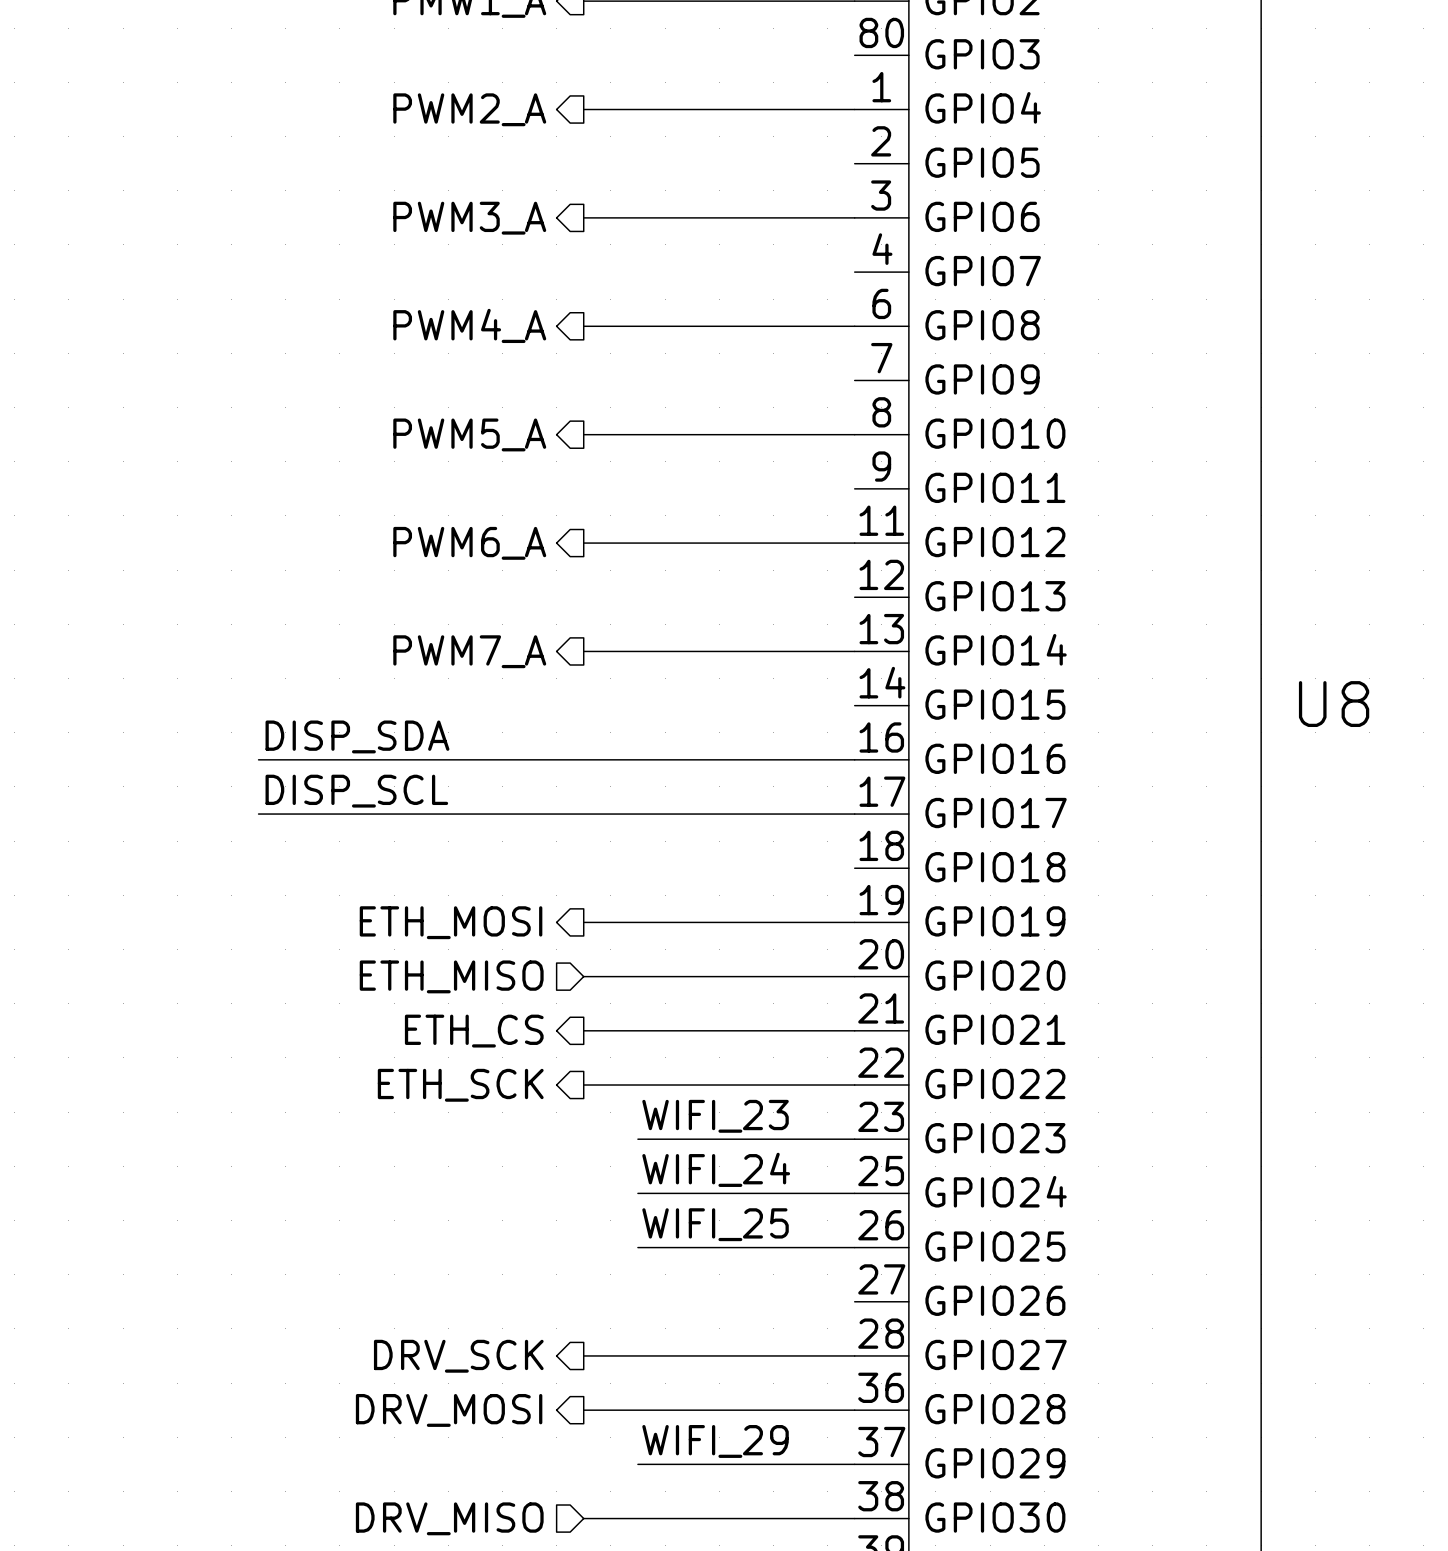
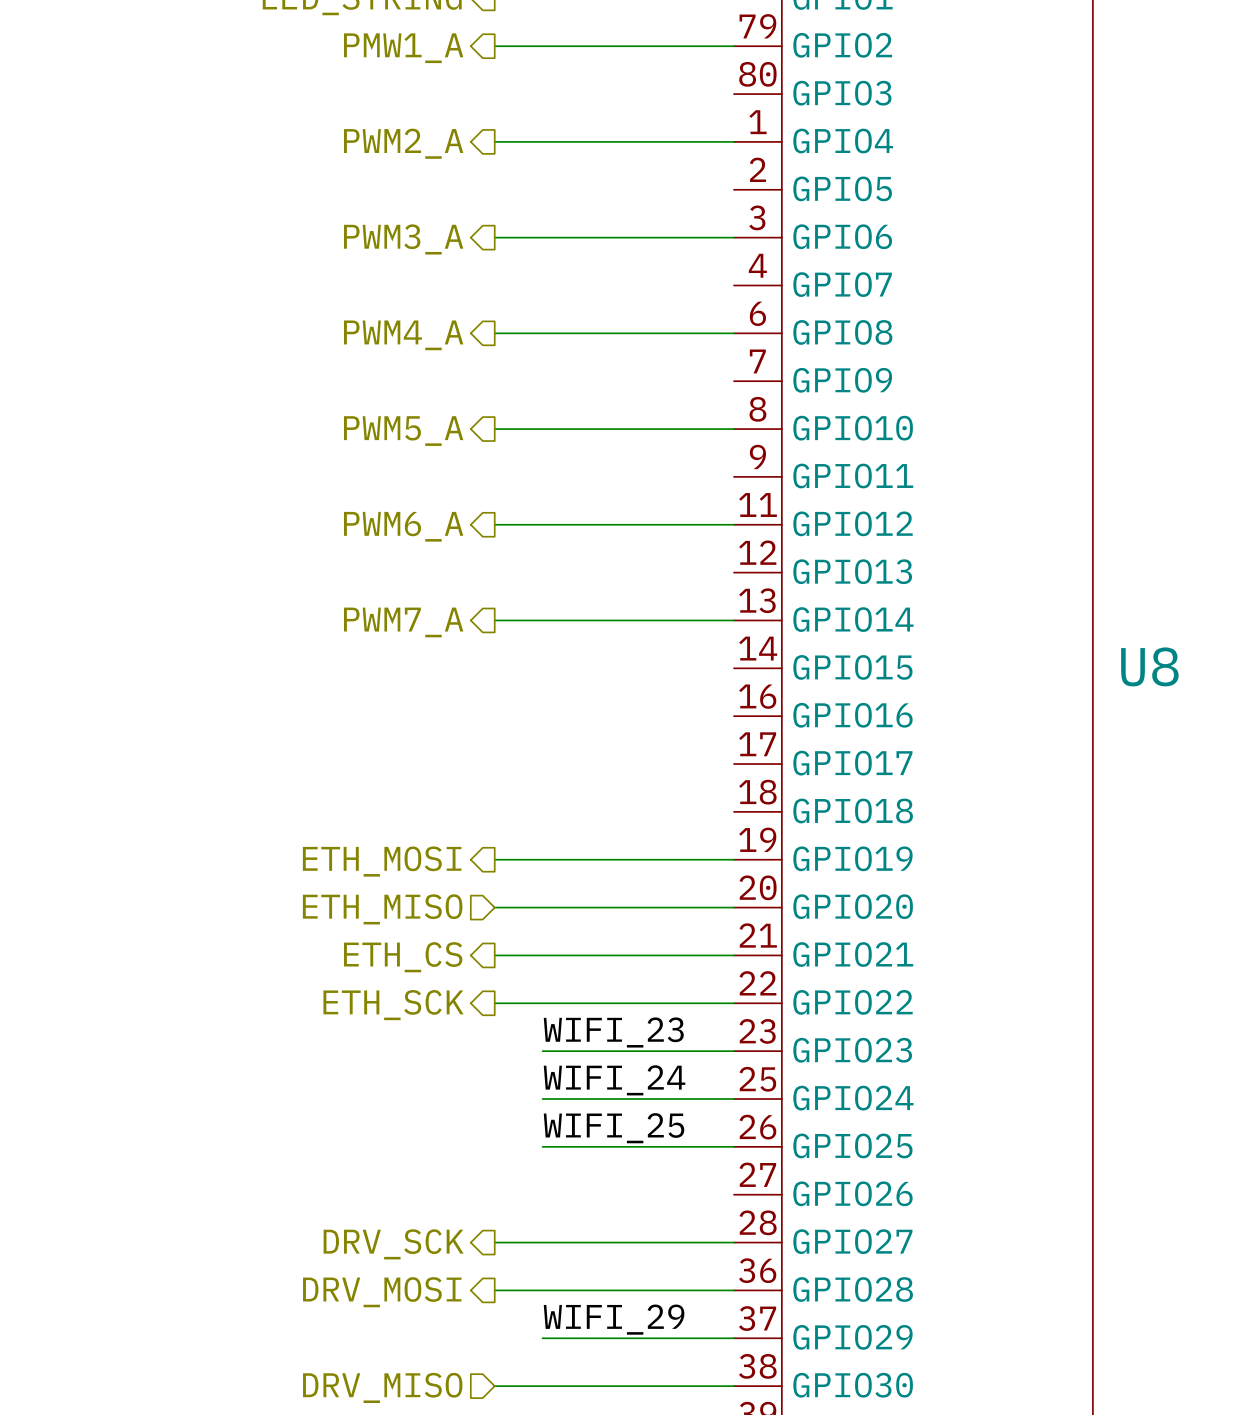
label: DISP_SDA (357, 736) -> none
wire: (258, 759) (854, 759) -> none
label: DISP_SCL (356, 791) -> none
wire: (258, 814) (854, 814) -> none

